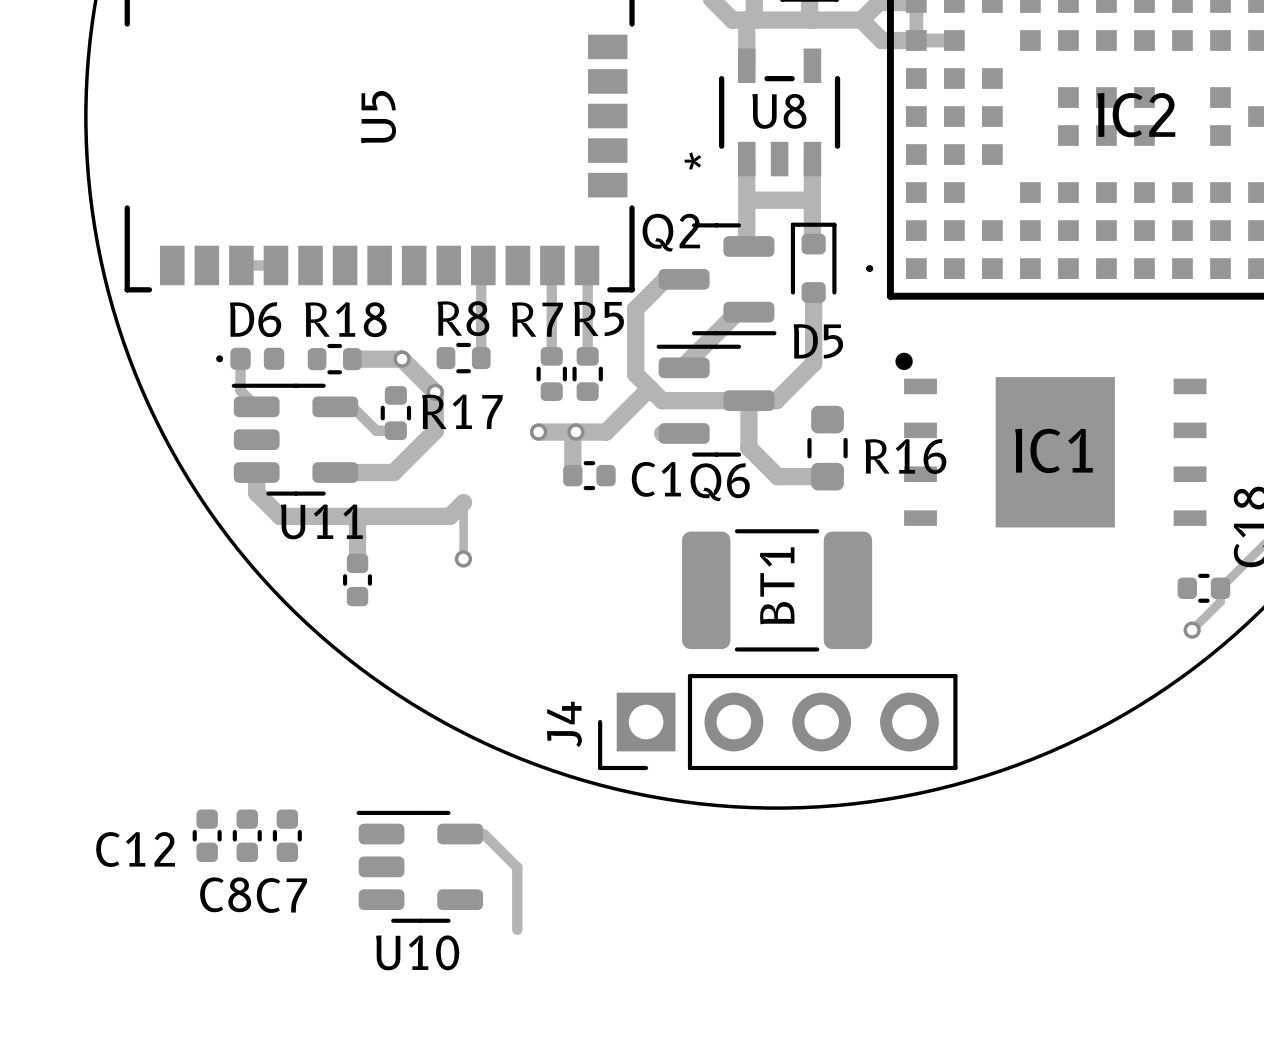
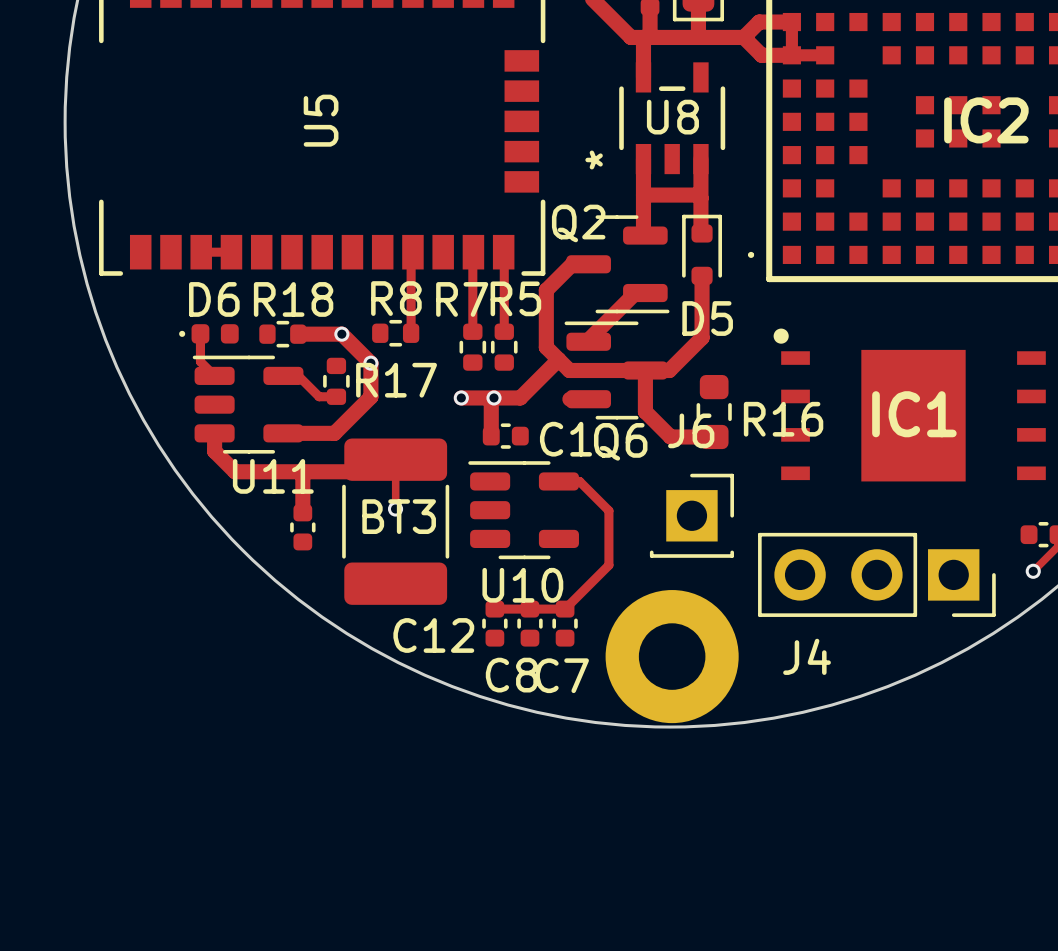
track: none -> (558, 481) (579, 481) (608, 510) (608, 565) (565, 609) (494, 609)
J6: none -> (691, 515)
BT3: none -> (395, 521)
BT1: (777, 590) -> none
J4 footprint: [598, 673, 958, 771] -> [758, 532, 996, 617]
J4 name position: J4 (564, 724) -> J4 (807, 656)
part: none -> (672, 656)
track: (483, 834) (517, 867) (517, 929) -> none
C12 position: (207, 835) -> (494, 623)
C8 position: (247, 835) -> (529, 623)
C7 position: (287, 835) -> (565, 623)
U10 position: (419, 866) -> (523, 510)

